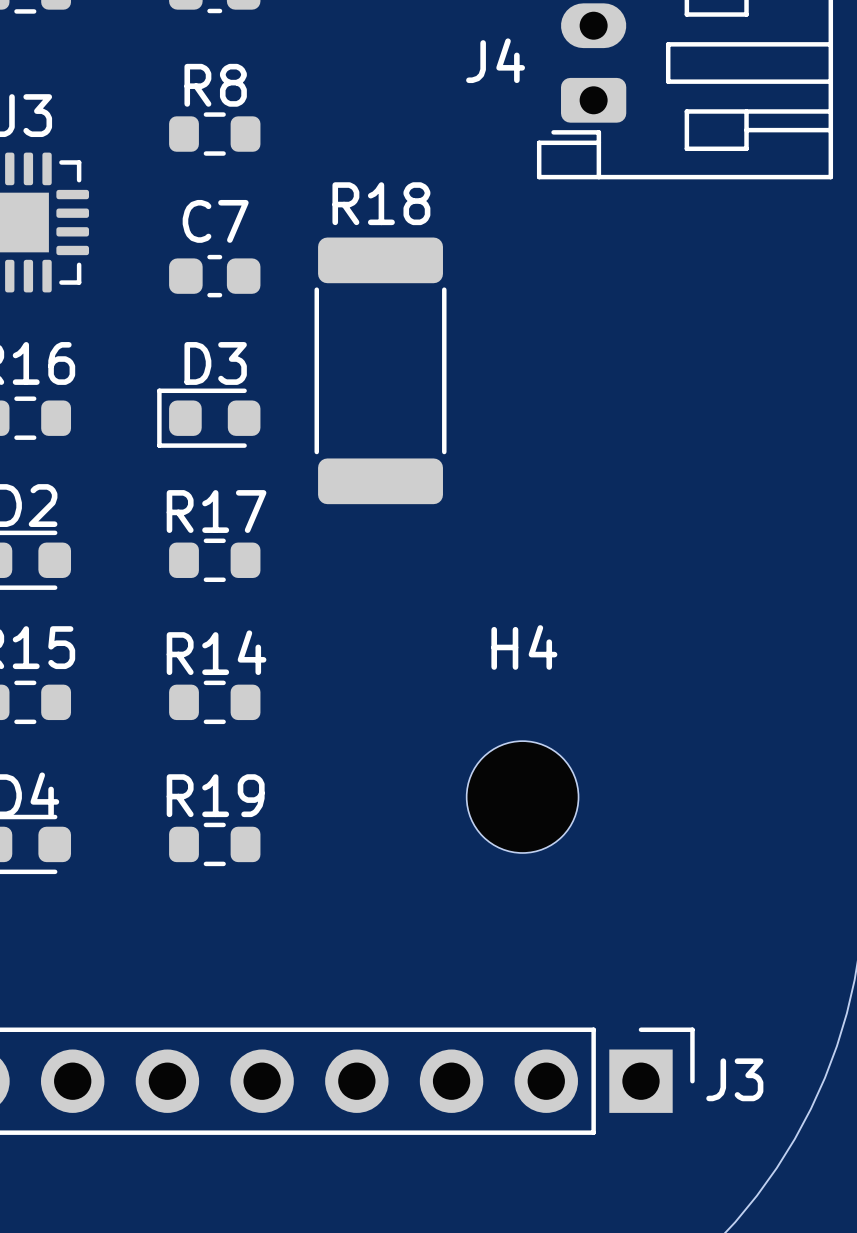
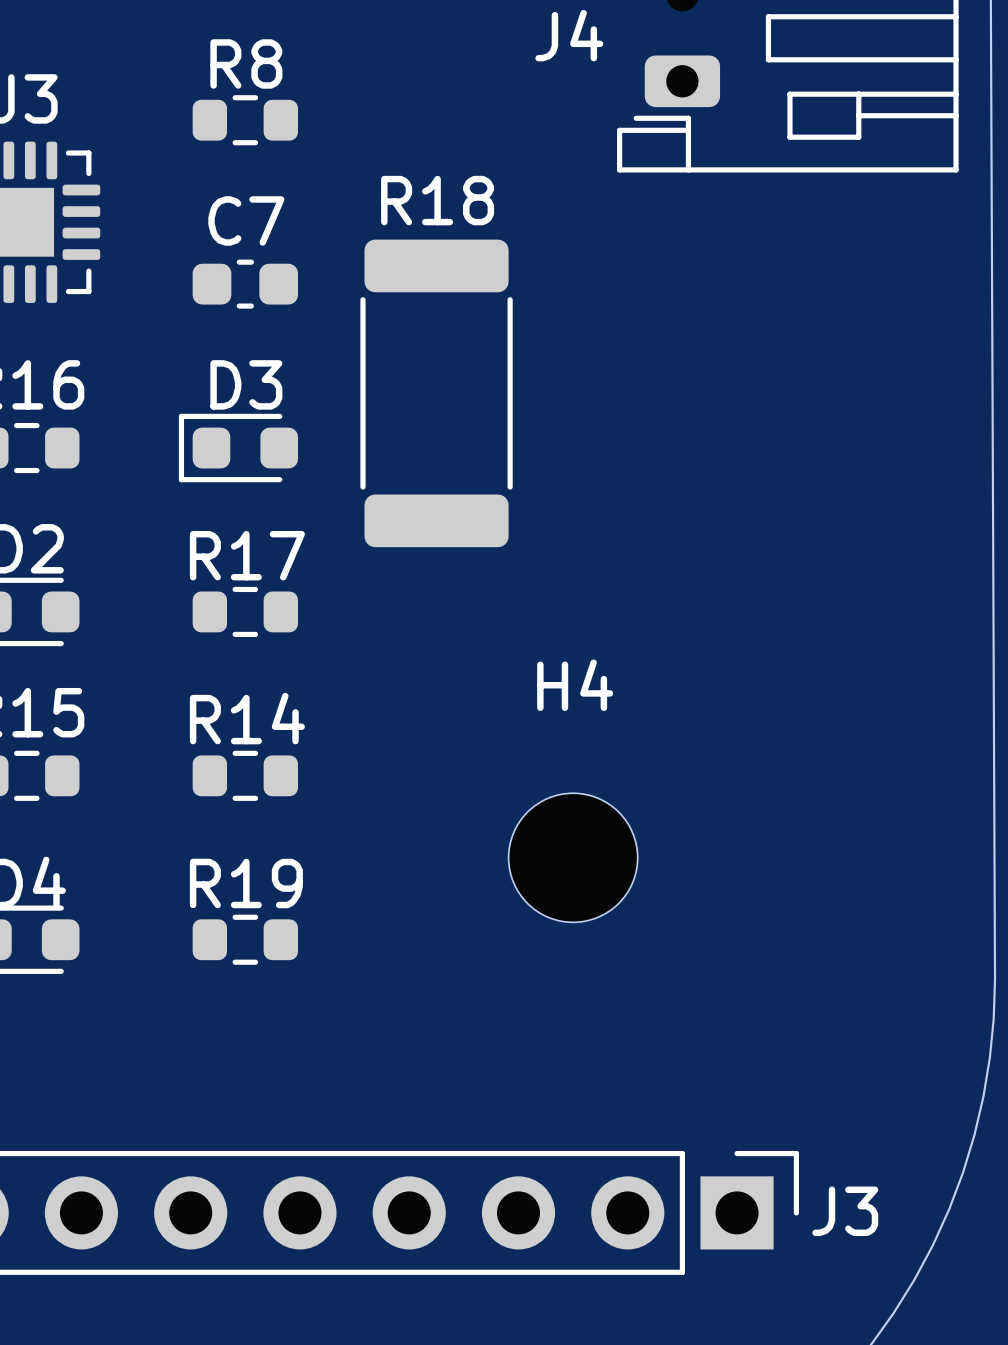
H4 position: (522, 797) -> (573, 857)

